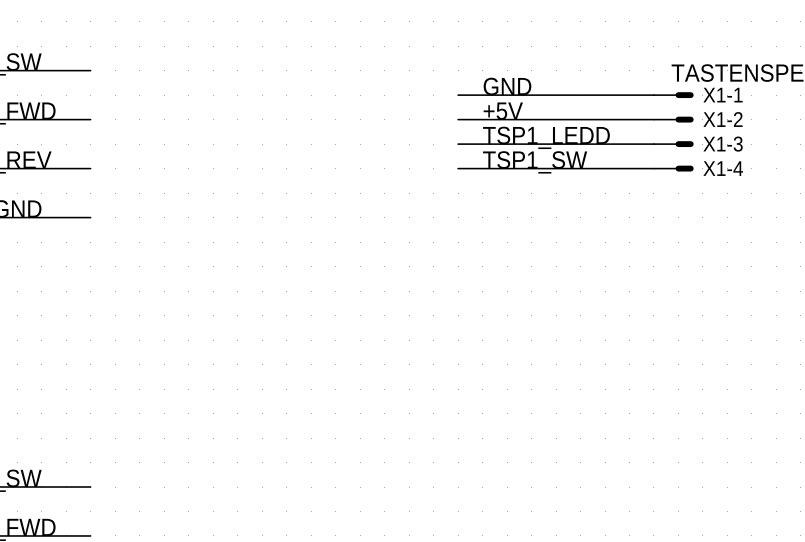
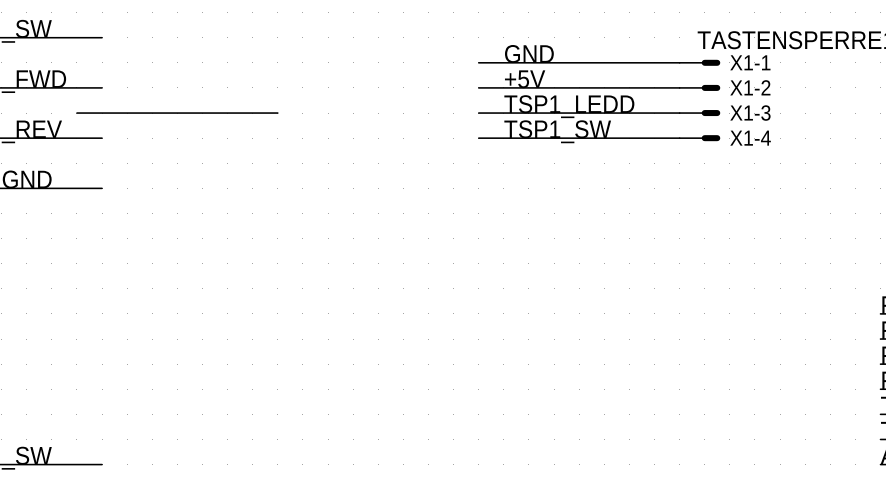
wire: none -> (76, 113) (277, 113)

